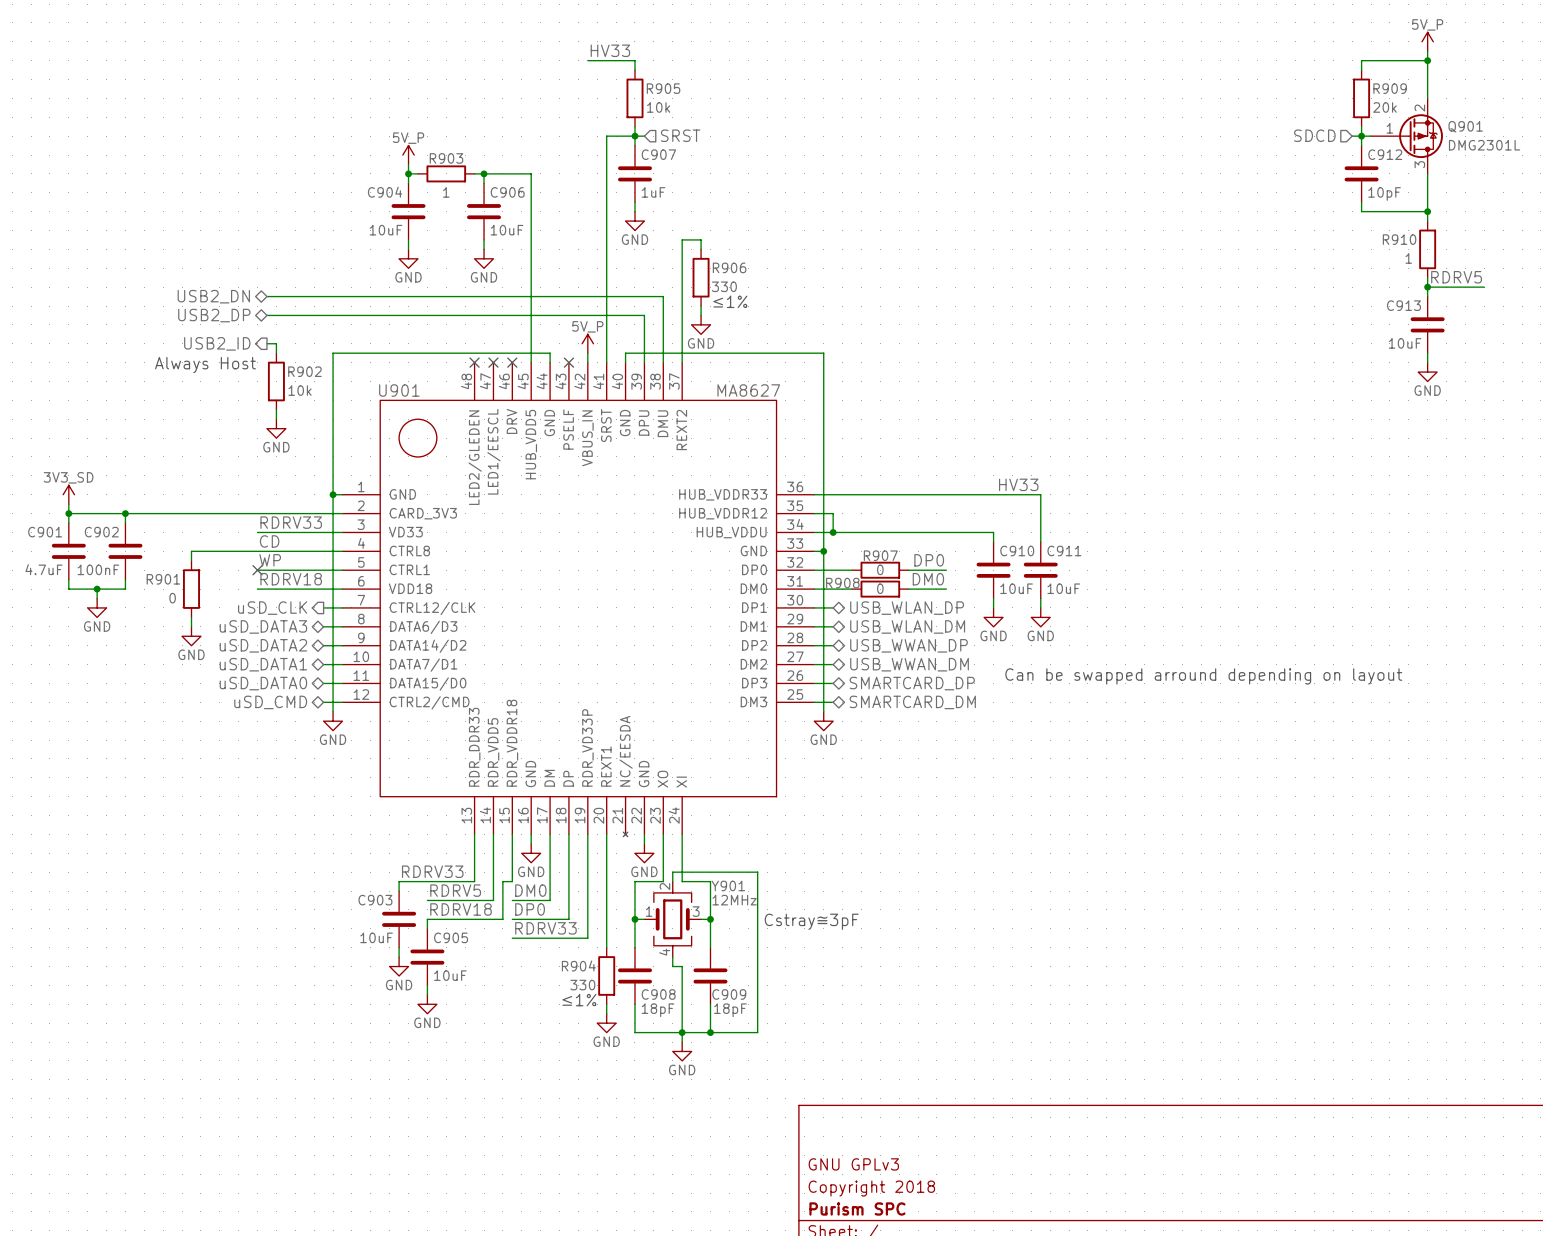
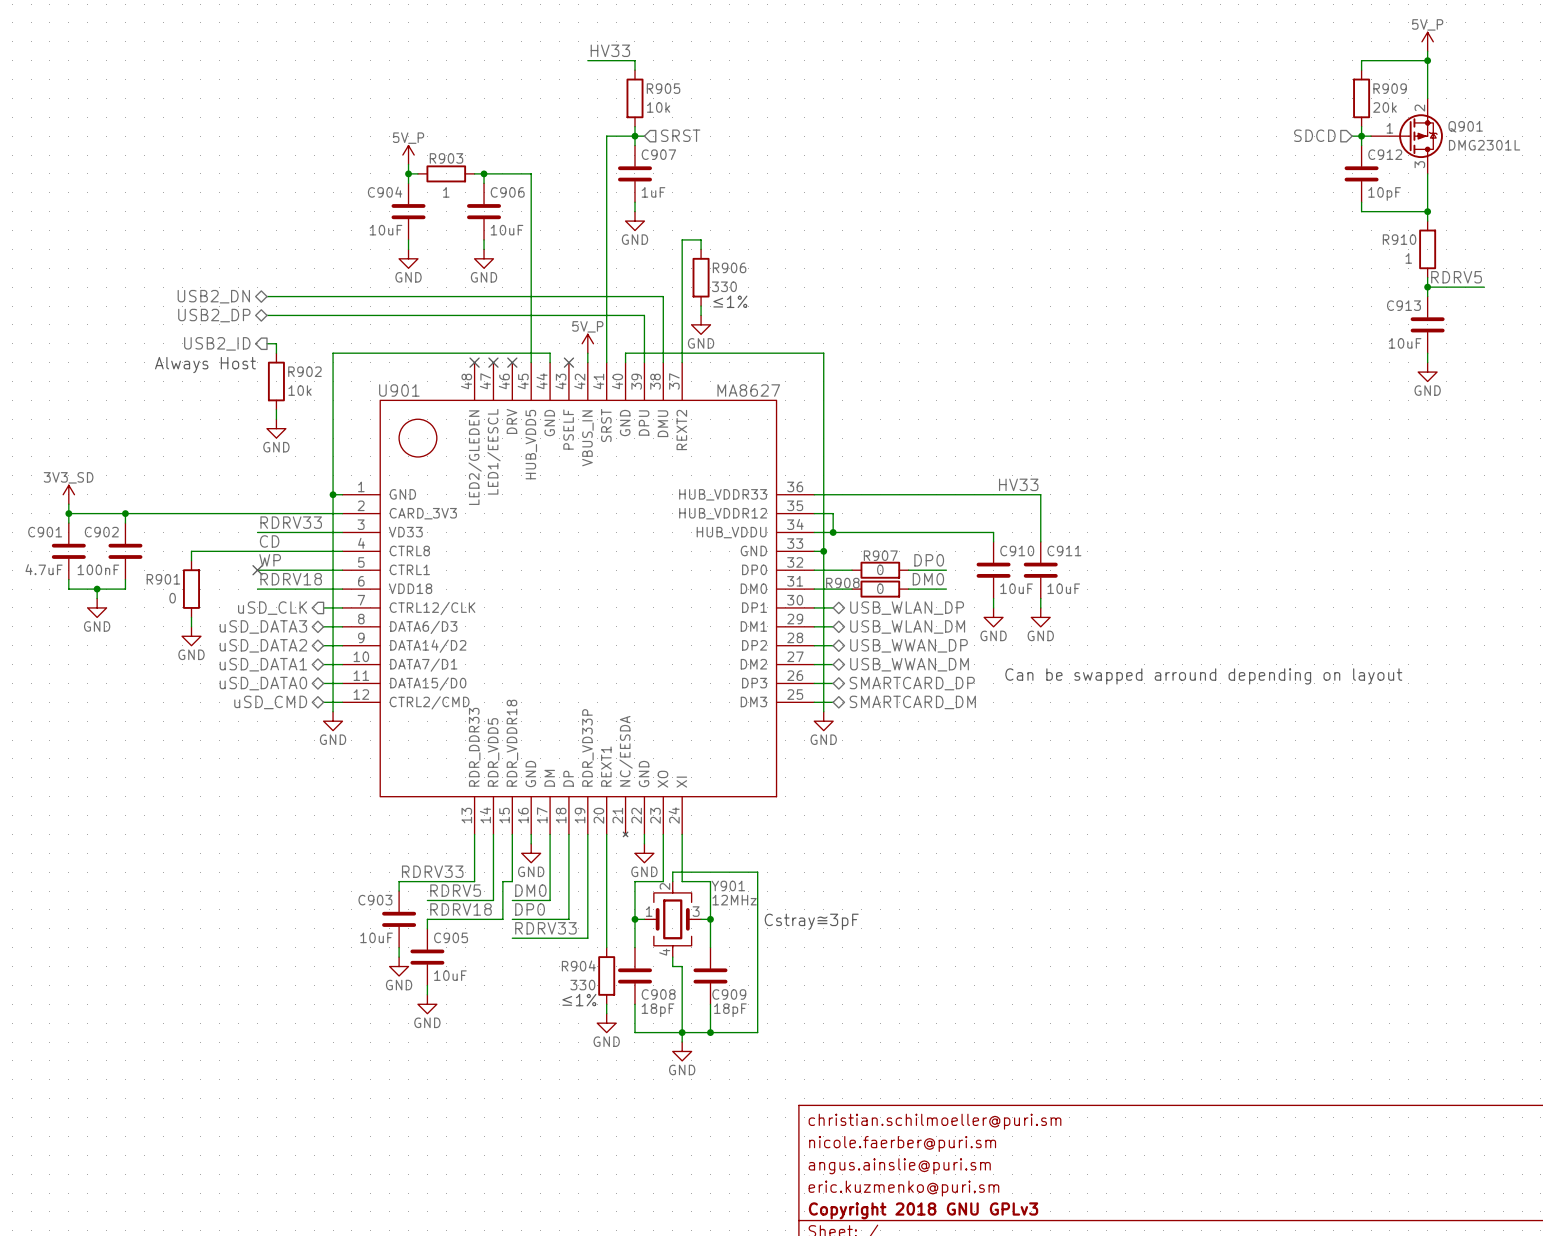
title block: none -> christian.schilmoeller@puri.sm (935, 1121)
title block: none -> nicole.faerber@puri.sm (902, 1143)
title block: GNU GPLv3 (853, 1164) -> angus.ainslie@puri.sm (899, 1166)
title block: Copyright 2018 (871, 1188) -> eric.kuzmenko@puri.sm (903, 1188)
title block: Purism SPC (857, 1208) -> Copyright 2018 GNU GPLv3 (923, 1210)

